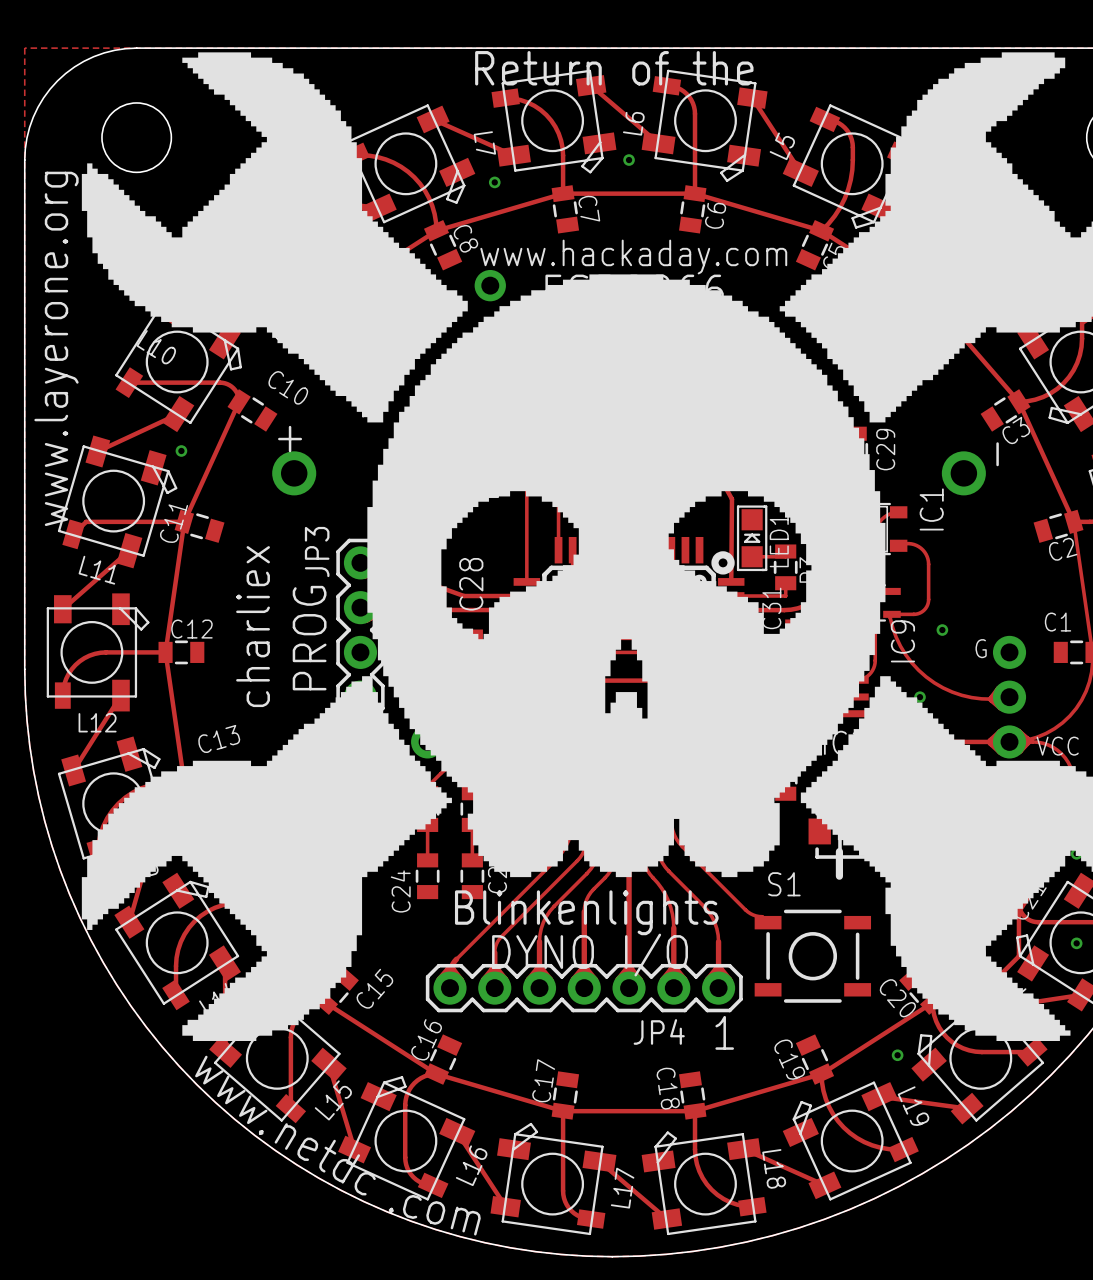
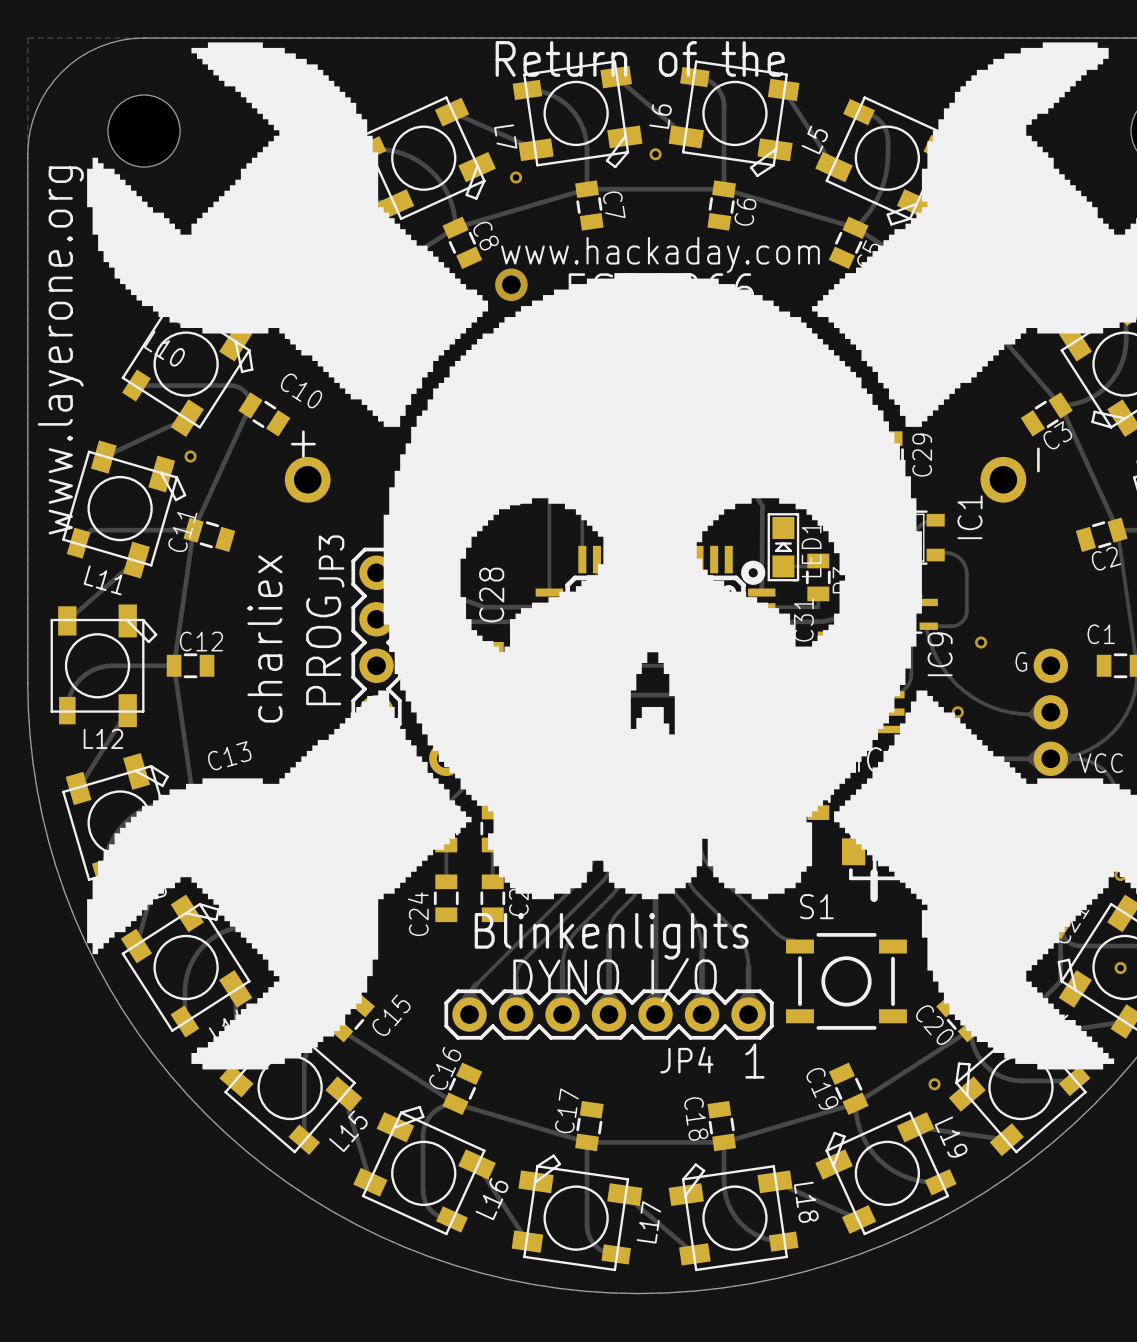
text: www. (231, 1095) -> none
text: netdc (325, 1159) -> none
text: .com (434, 1215) -> none

